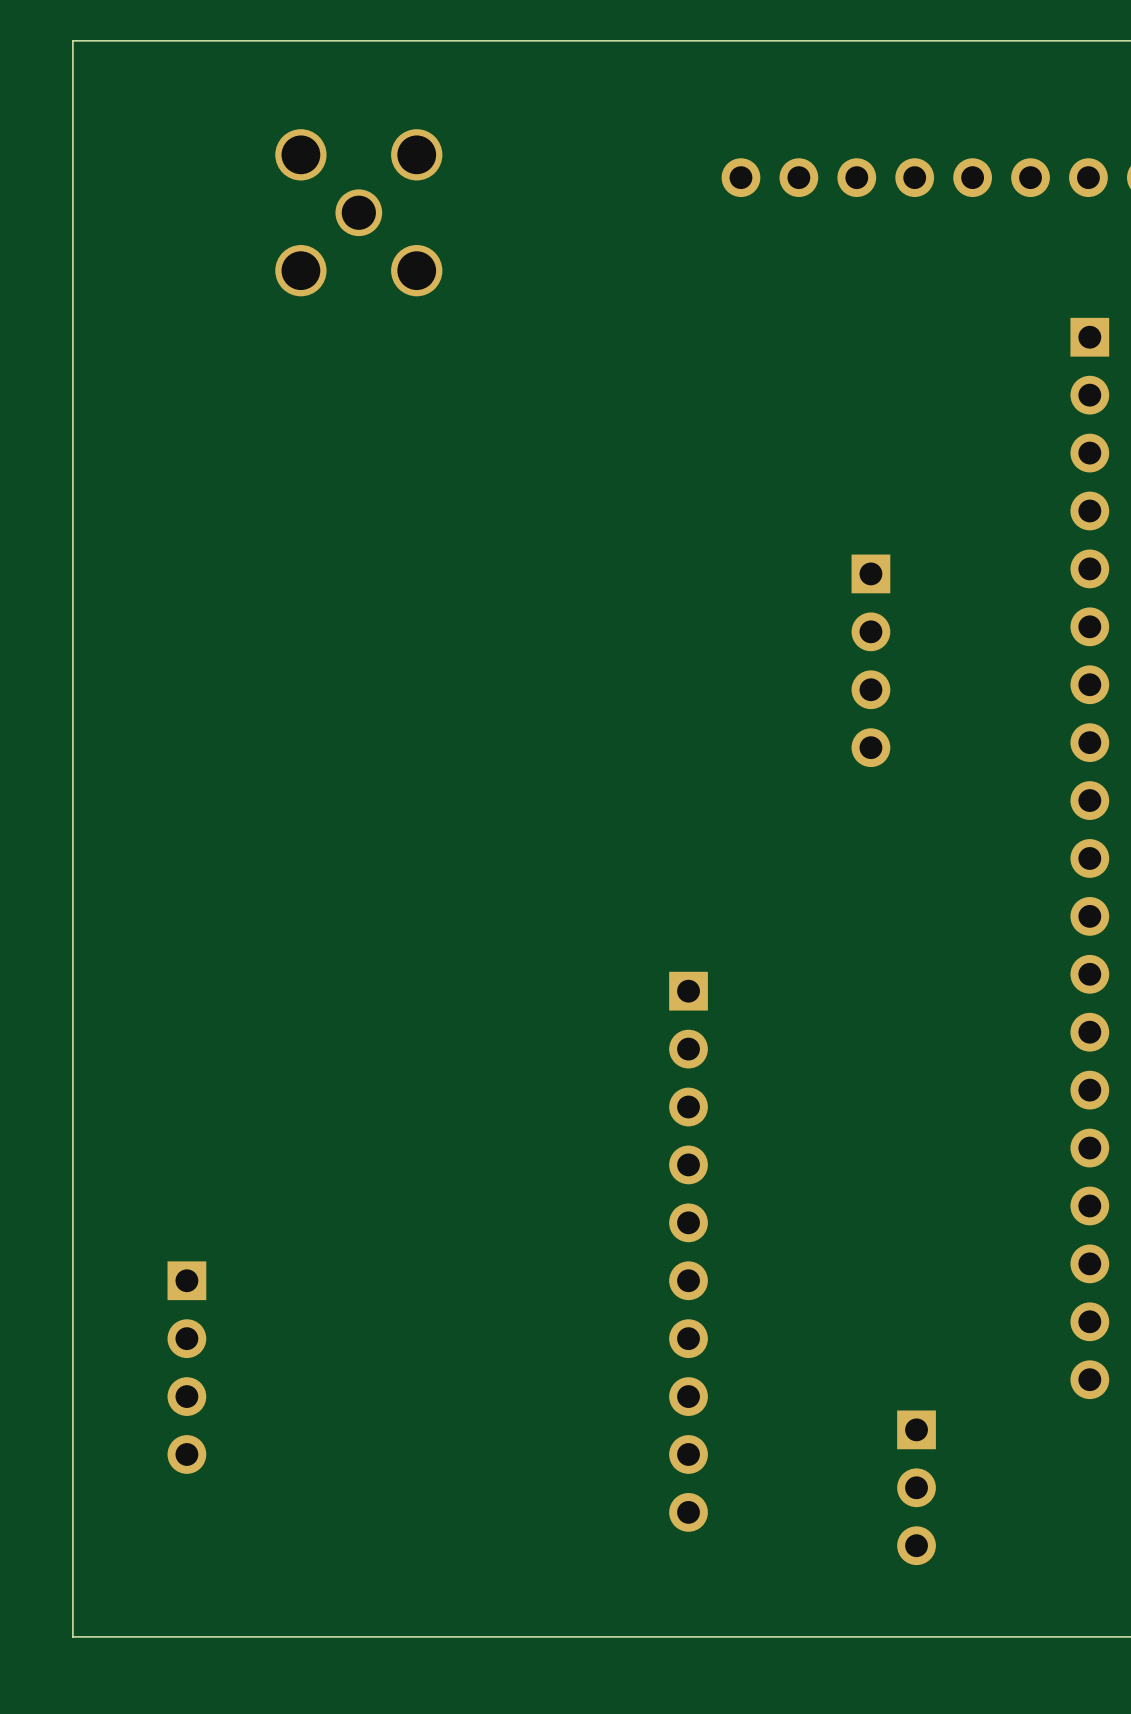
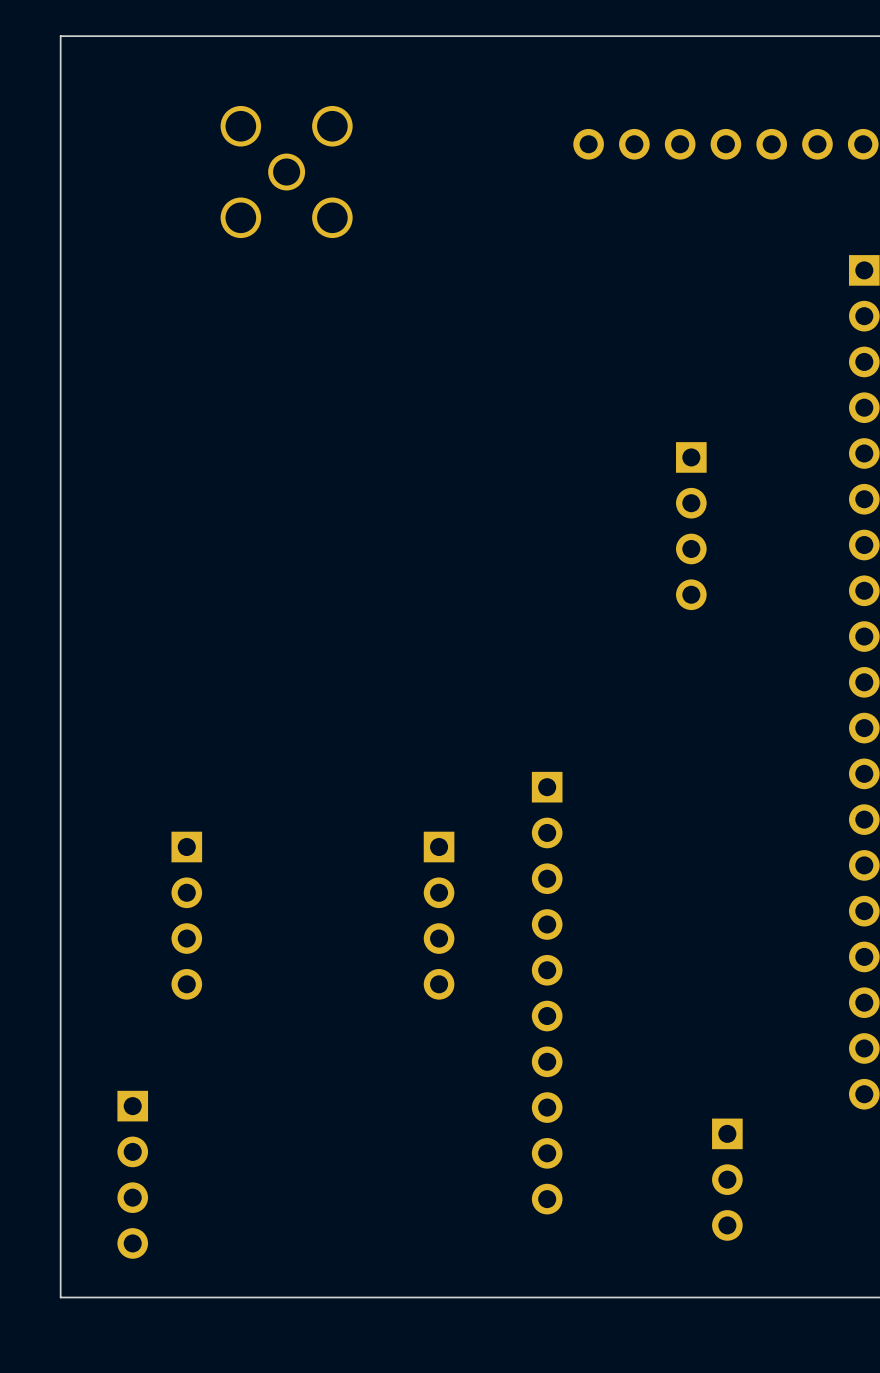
part: none -> (186, 915)
part: none -> (439, 915)
part: (186, 1367) -> none
part: none -> (132, 1174)

